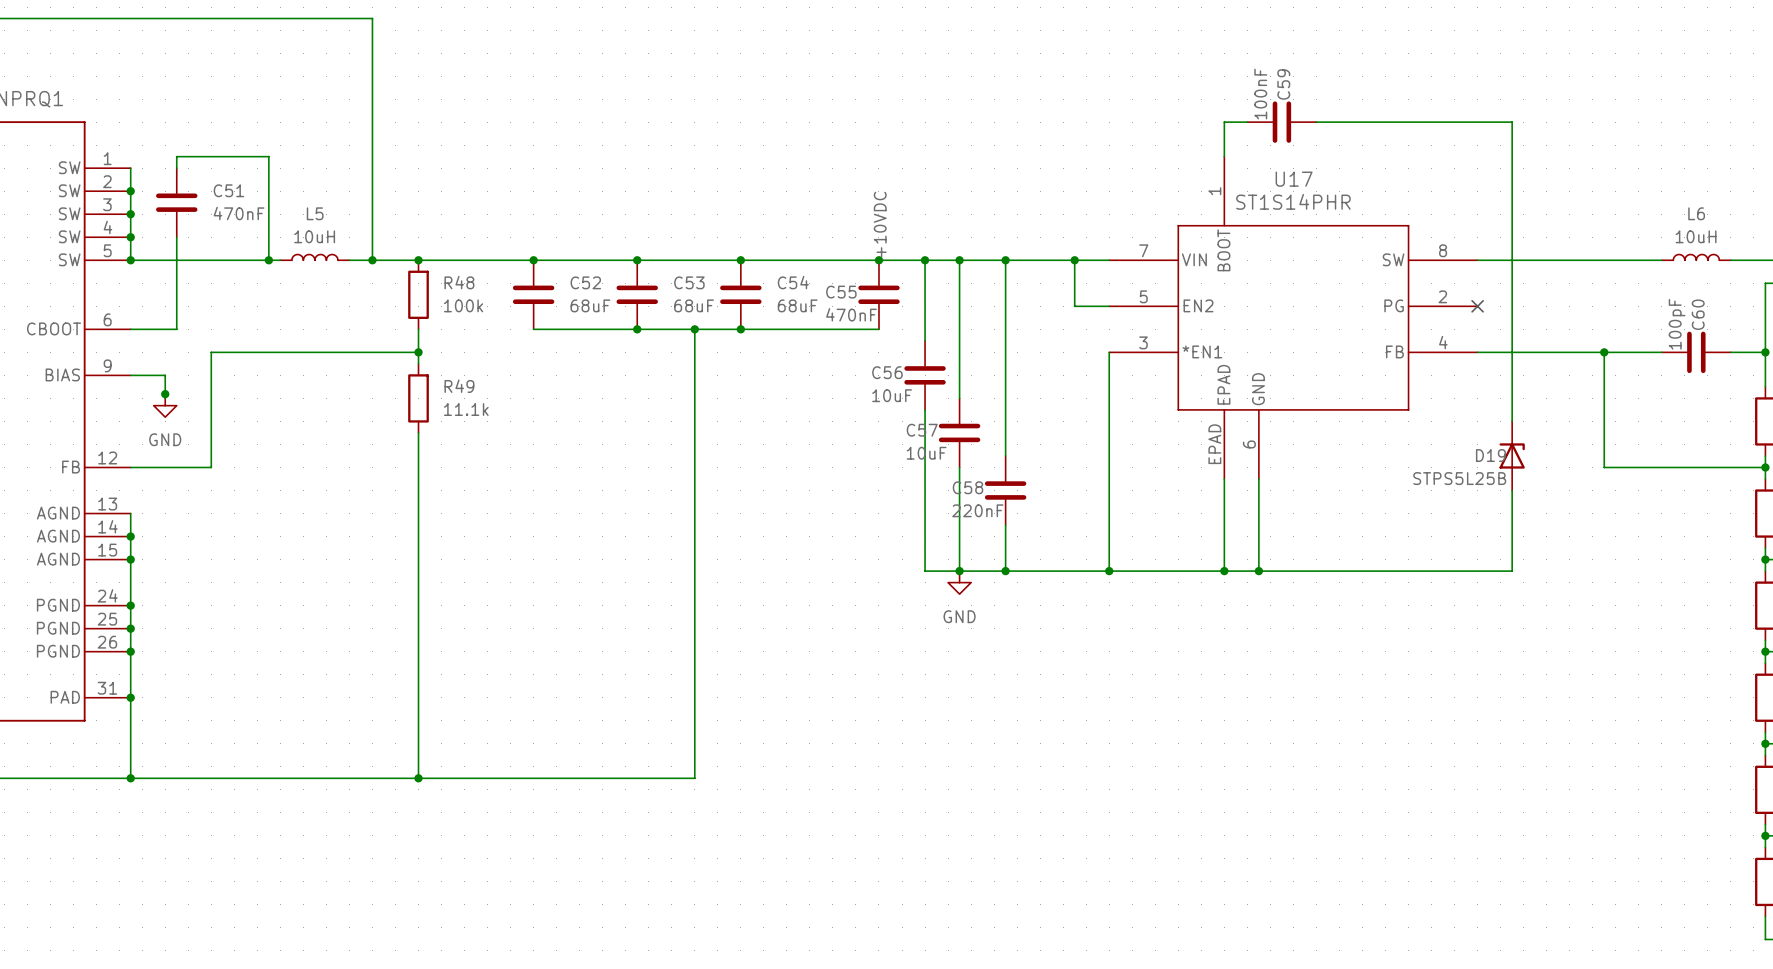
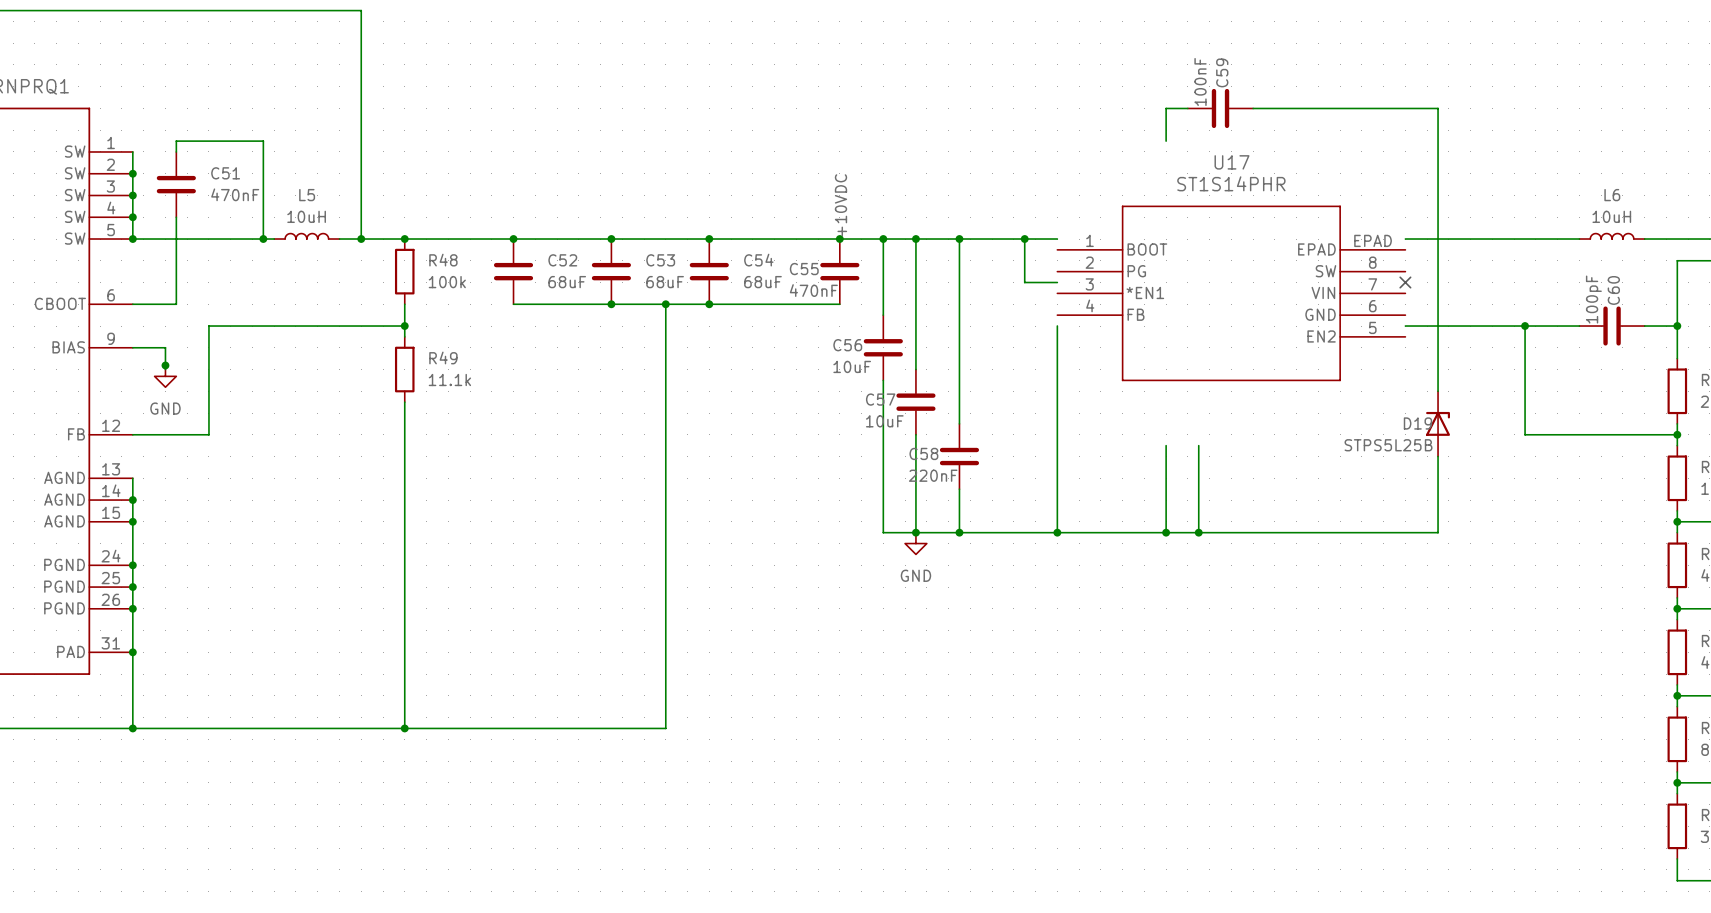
U17 symbol: [1109, 156, 1478, 480] -> [1057, 205, 1406, 381]

